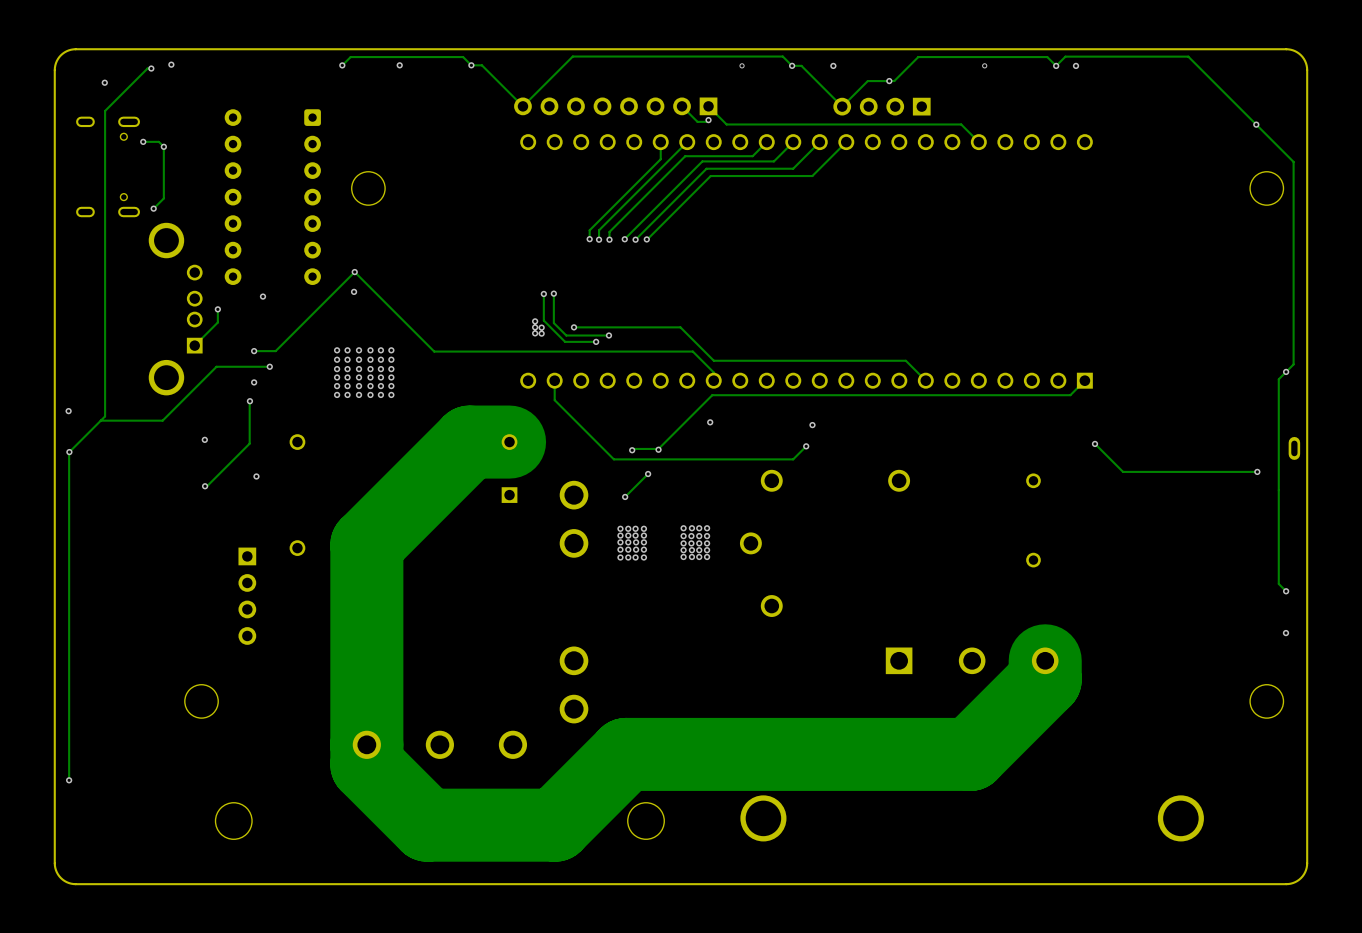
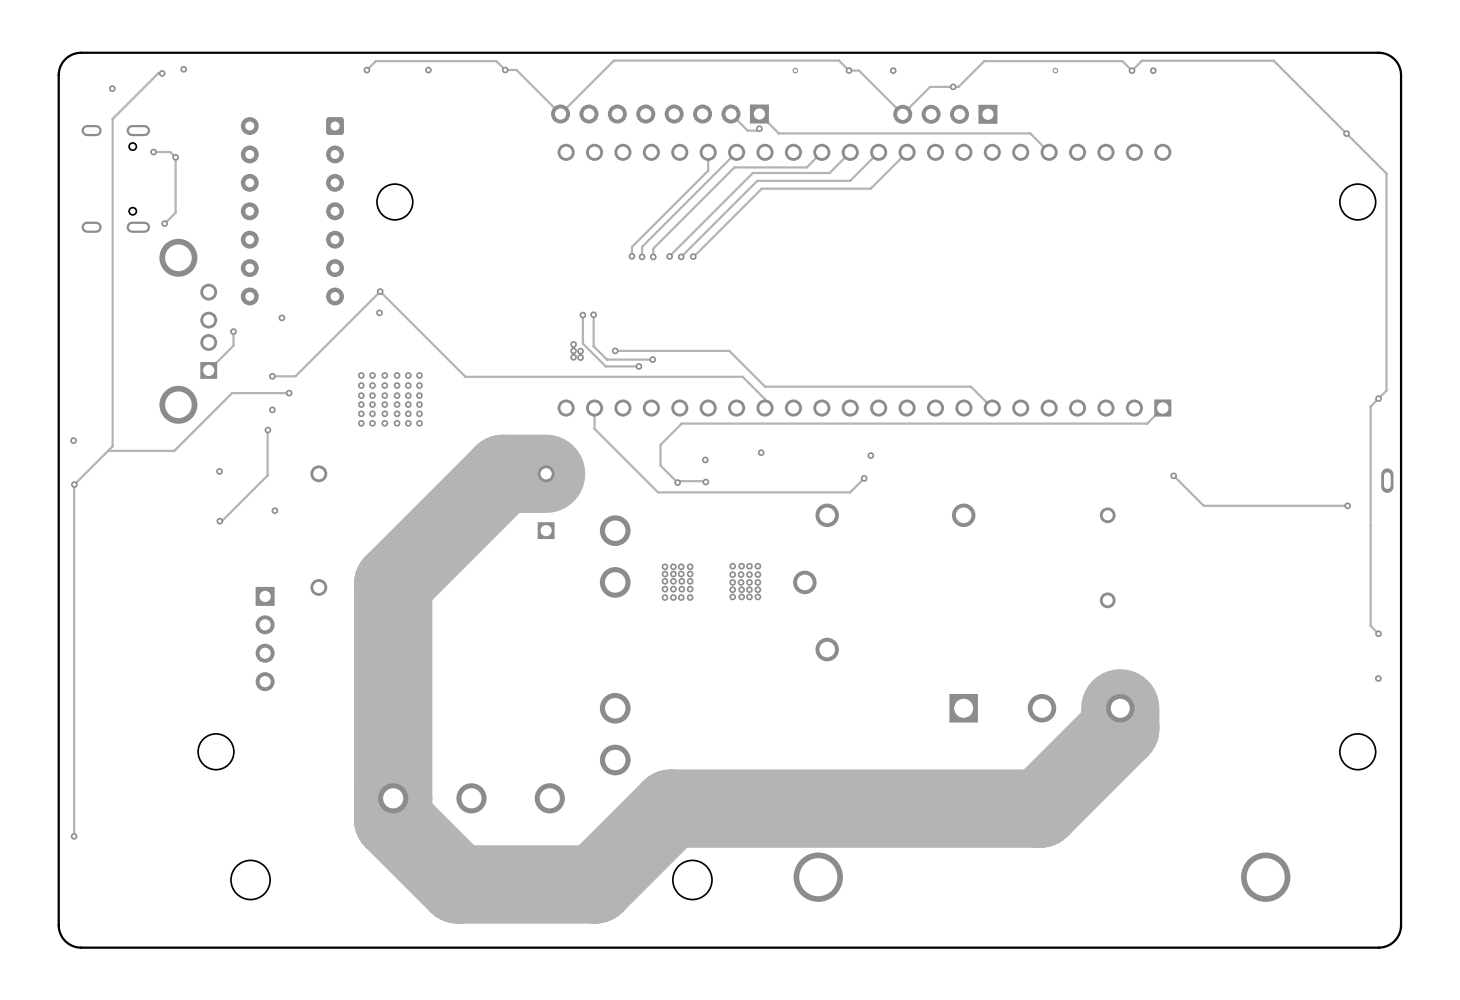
track: (712, 395) (658, 448) -> (763, 423) (681, 423) (660, 444) (660, 465) (677, 482)
via: none -> (705, 459)
track: (648, 474) (625, 496) -> none
via: (648, 474) -> none
via: (625, 496) -> none

